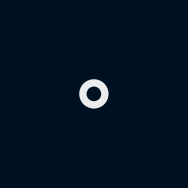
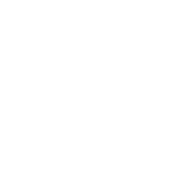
via: (93, 93) -> none

